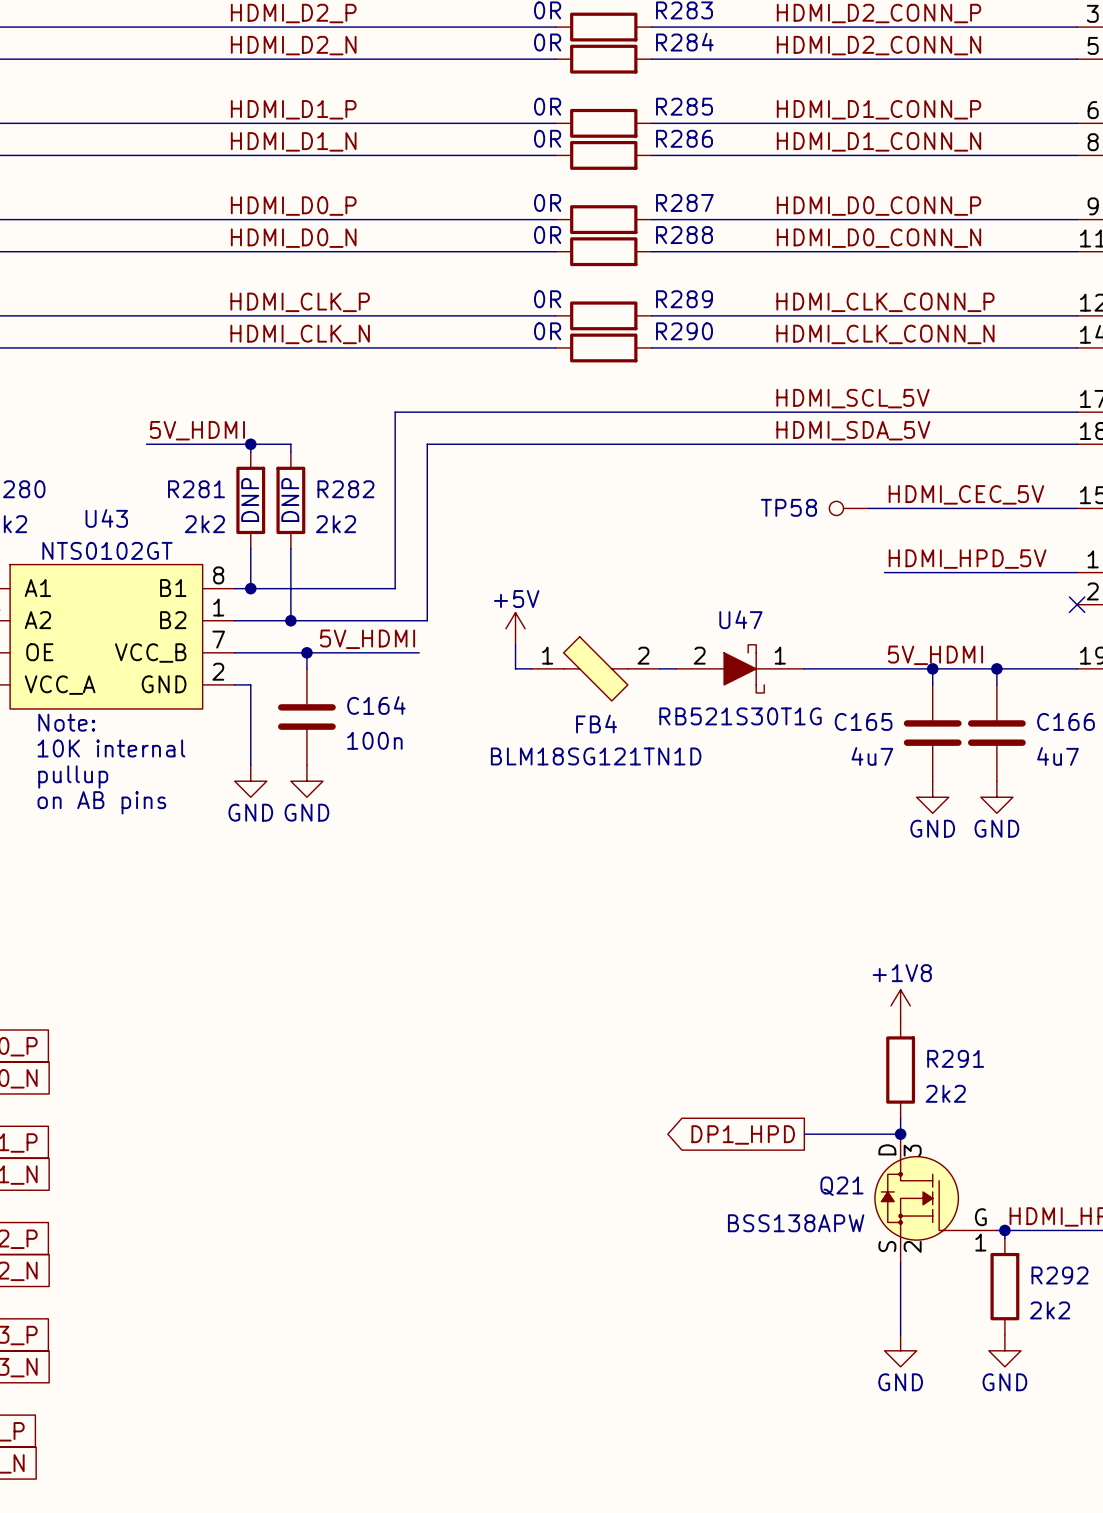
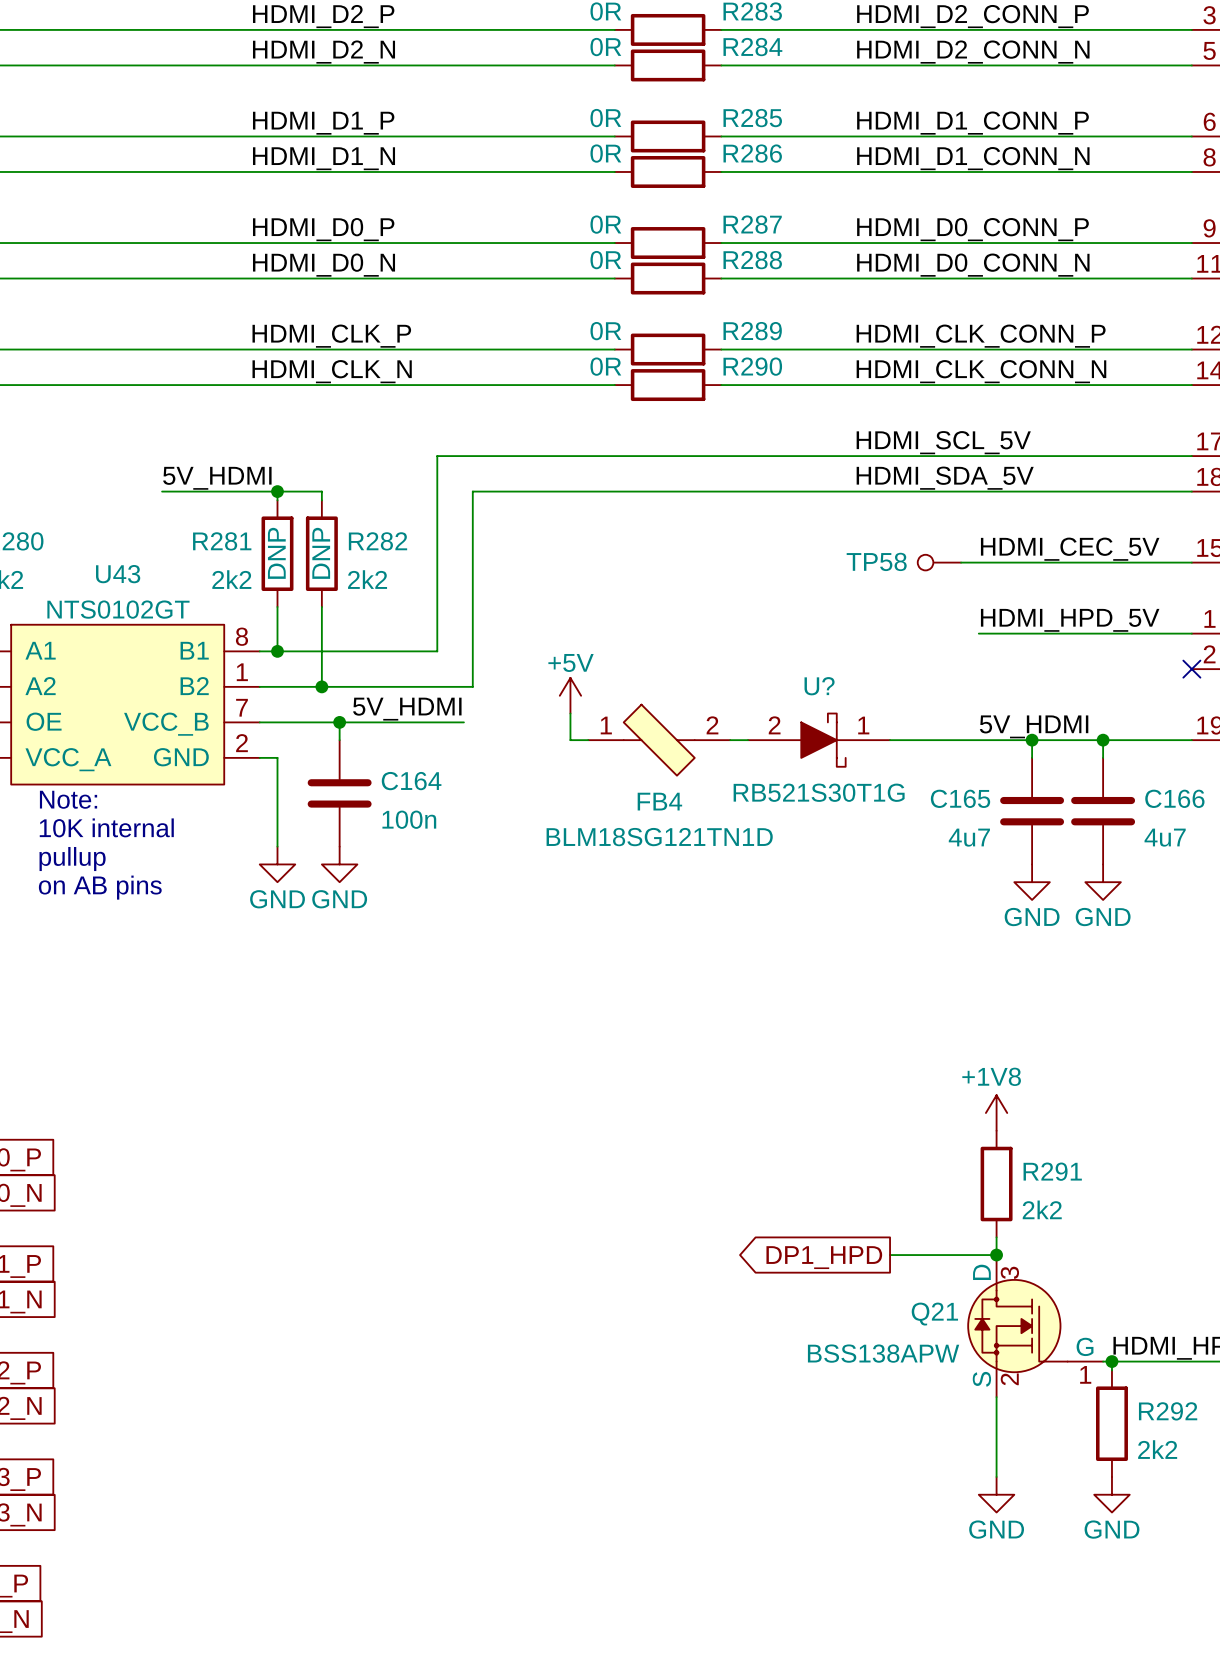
U47 name: U47 (740, 619) -> U? (819, 686)

